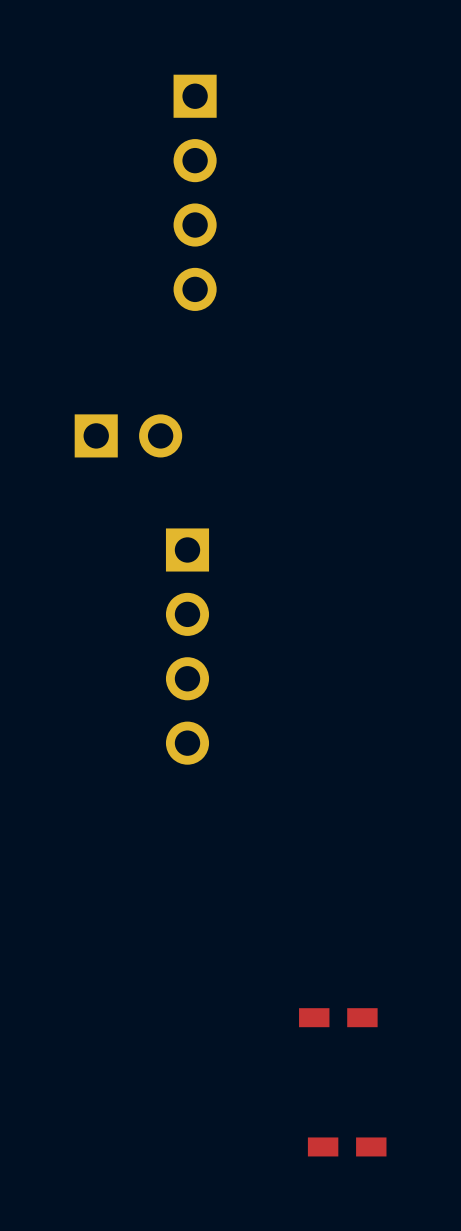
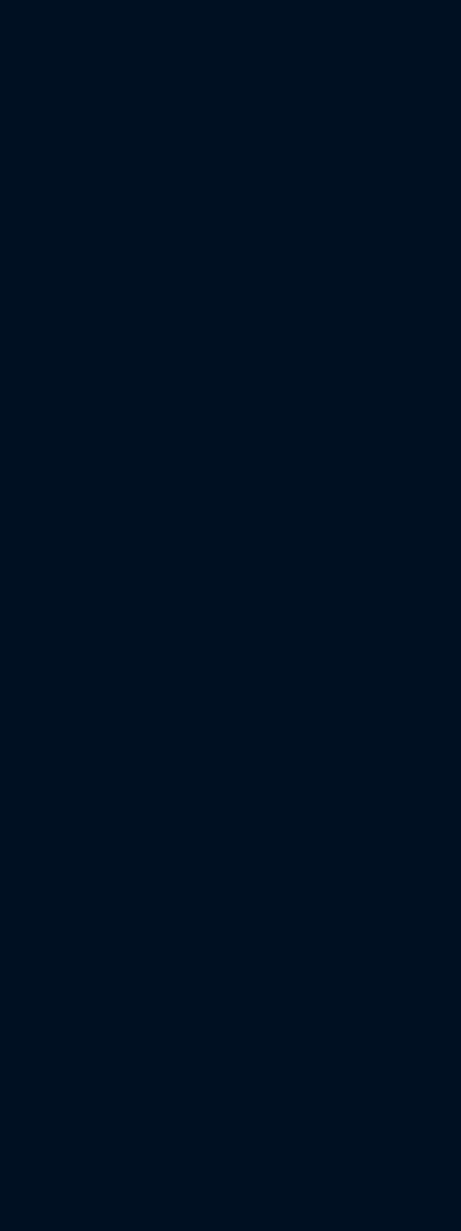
part: (195, 192) -> none
part: (128, 435) -> none
part: (187, 646) -> none
part: (338, 1017) -> none
part: (347, 1146) -> none

